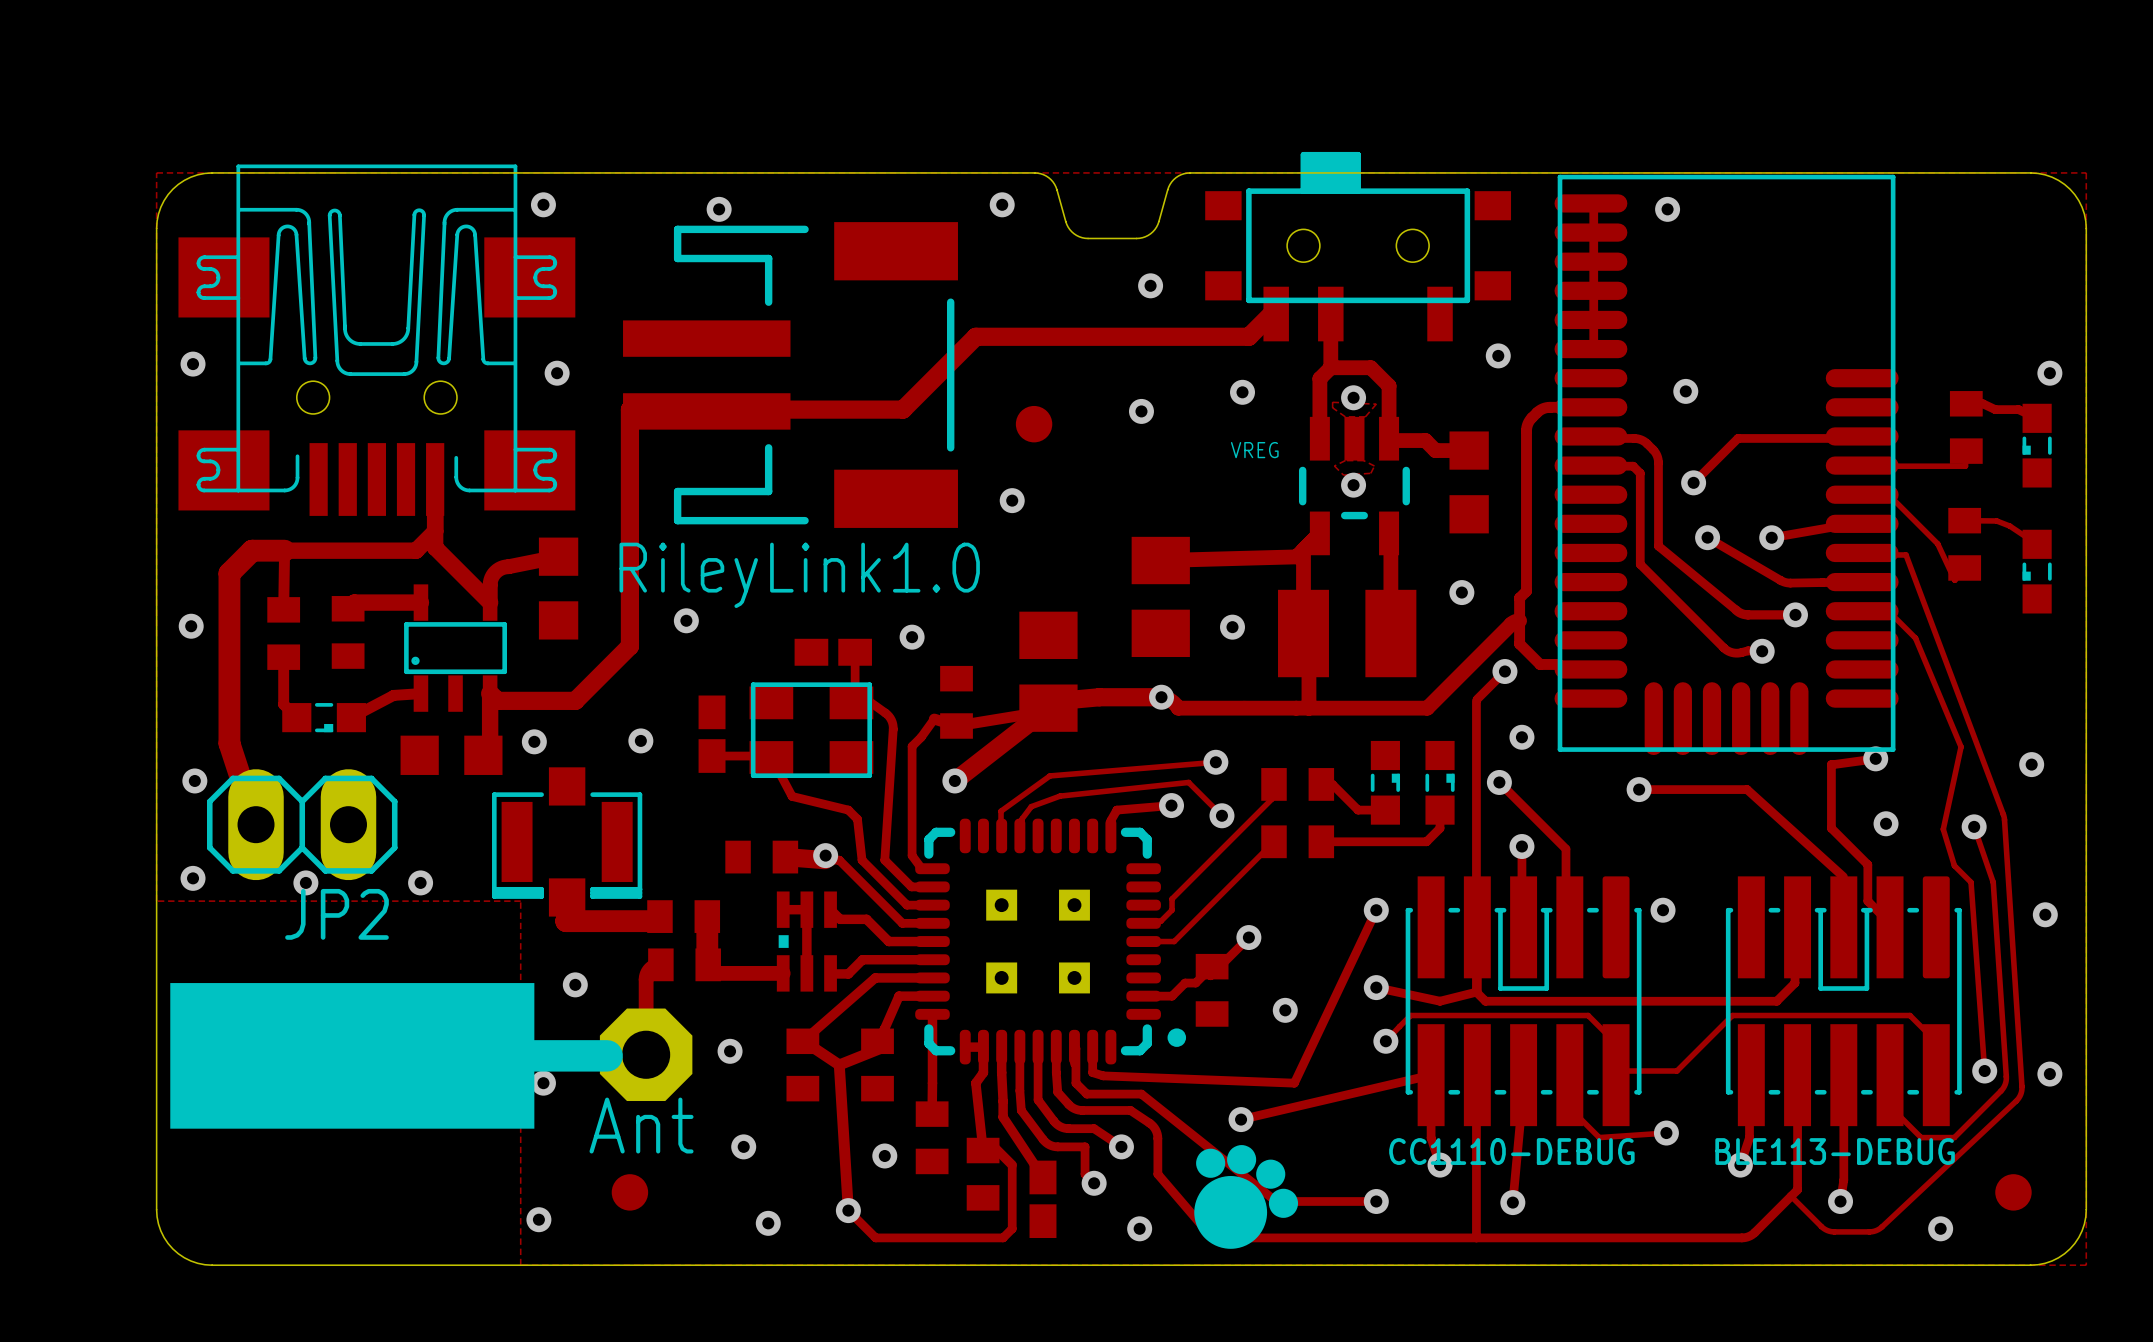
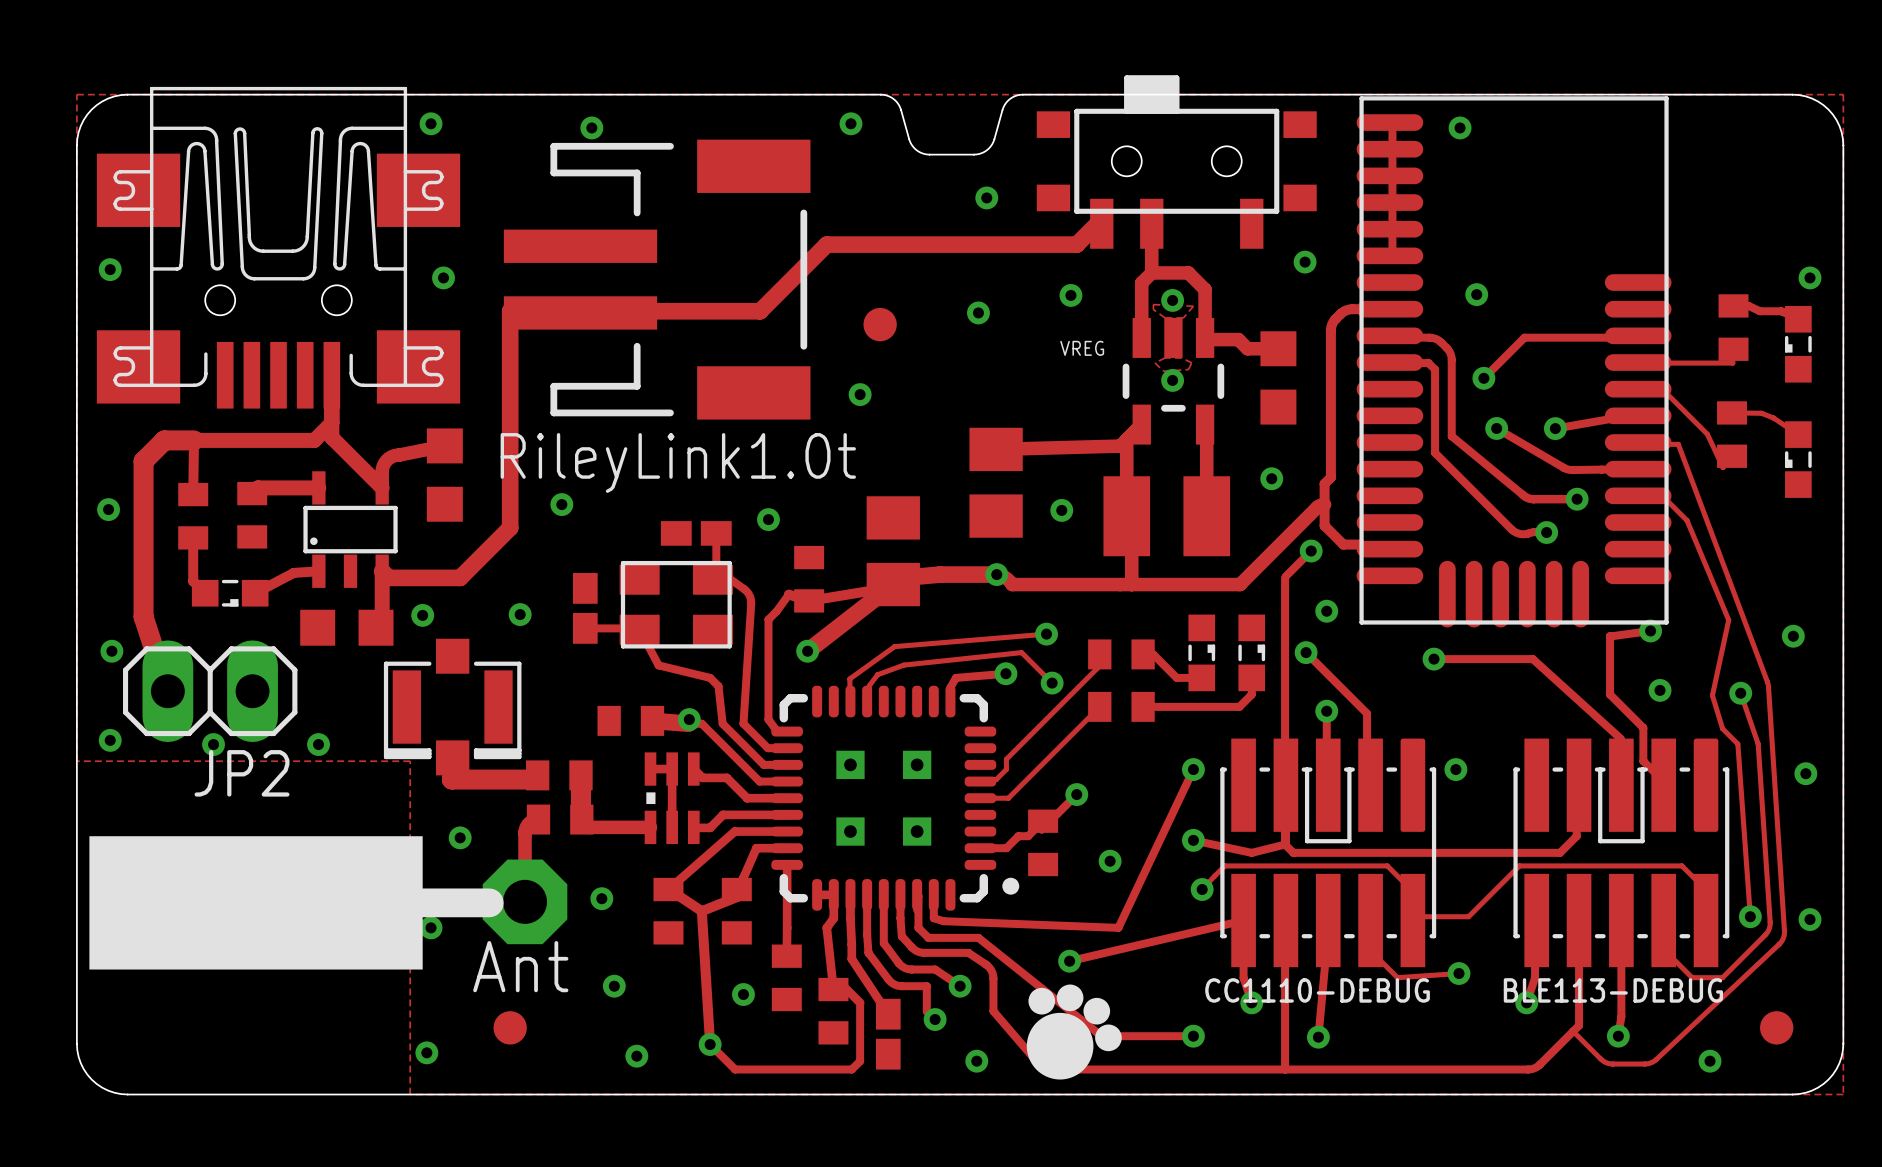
text: RileyLink1.0 (799, 575) -> RileyLink1.0t (678, 462)

